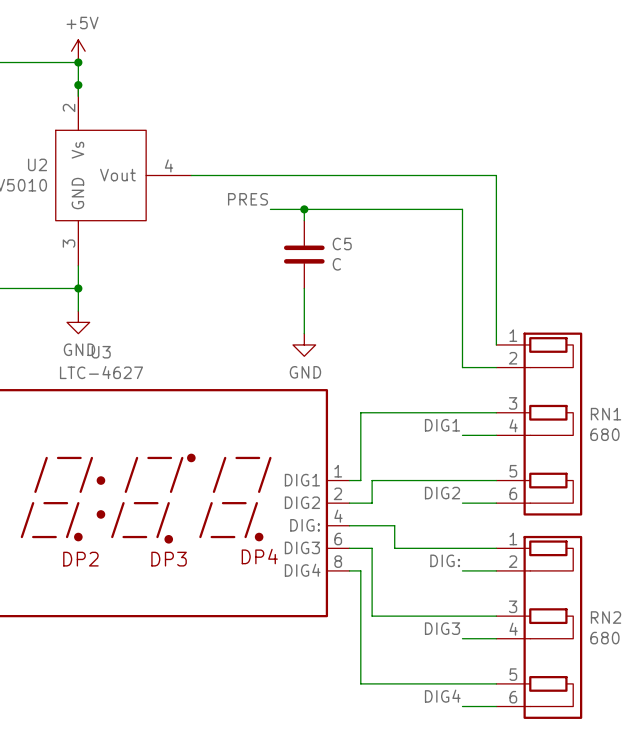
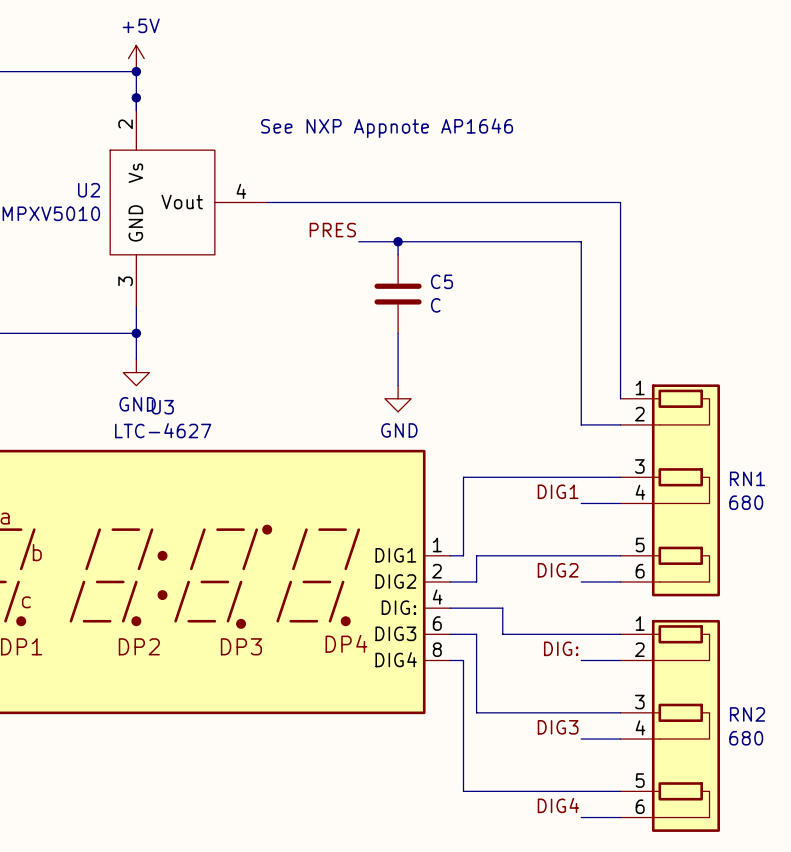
text: none -> See NXP Appnote AP1646 (387, 128)

